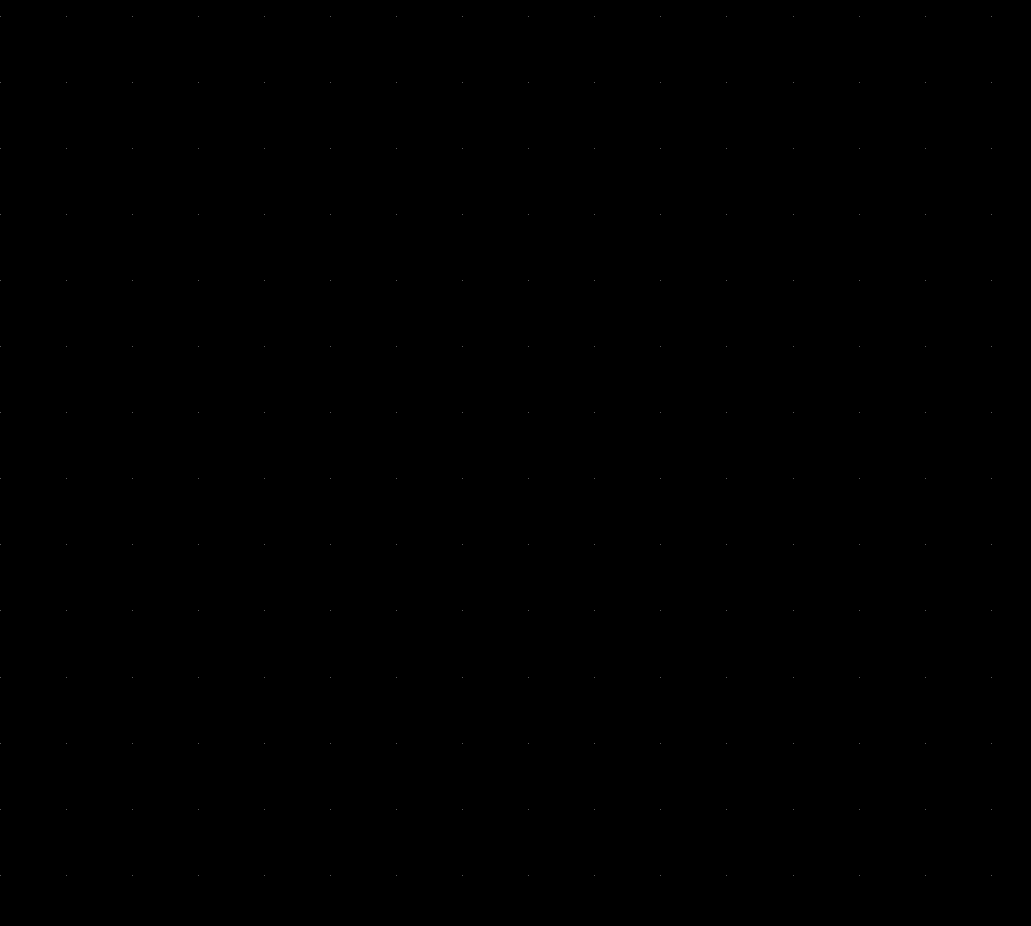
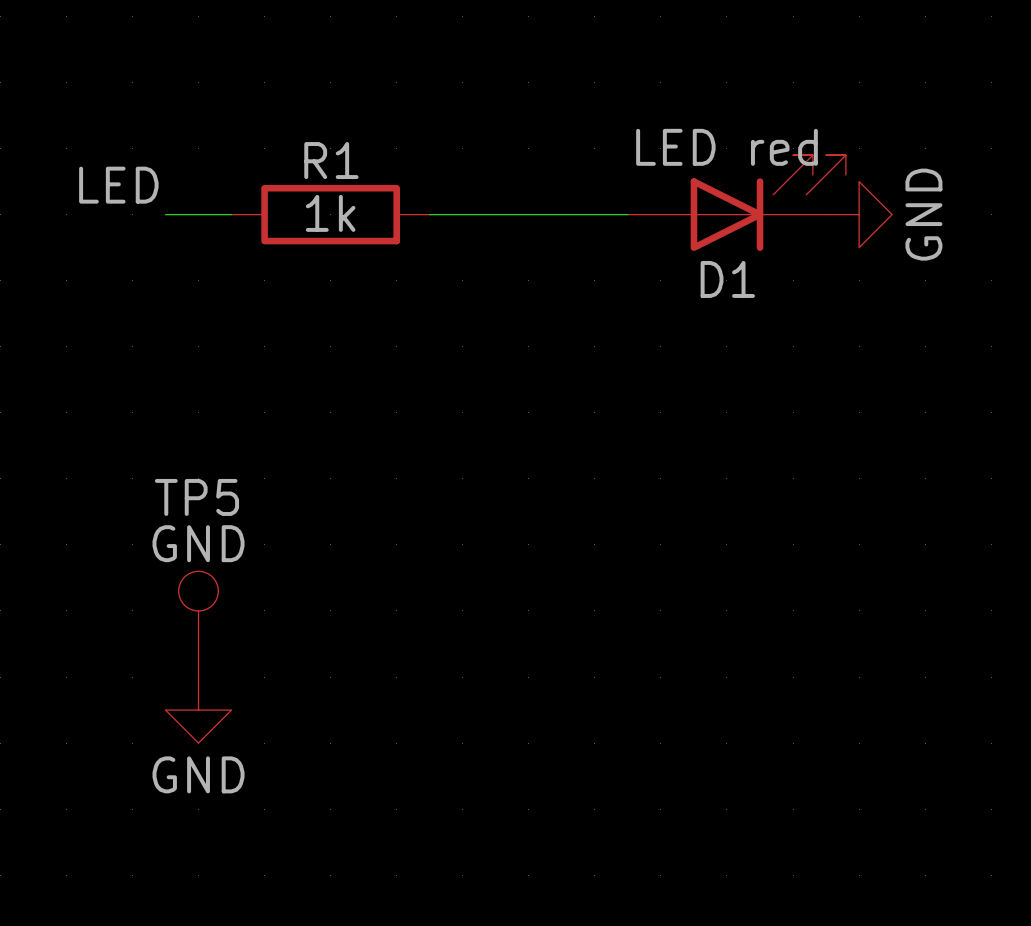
label: none -> LED (118, 185)
D1: none -> LED red (736, 203)
wire: none -> (165, 214) (231, 214)
R1: none -> 1k (330, 214)
wire: none -> (429, 214) (627, 214)
power symbol: none -> GND (859, 214)
TP5: none -> GND (198, 624)
power symbol: none -> GND (198, 710)

